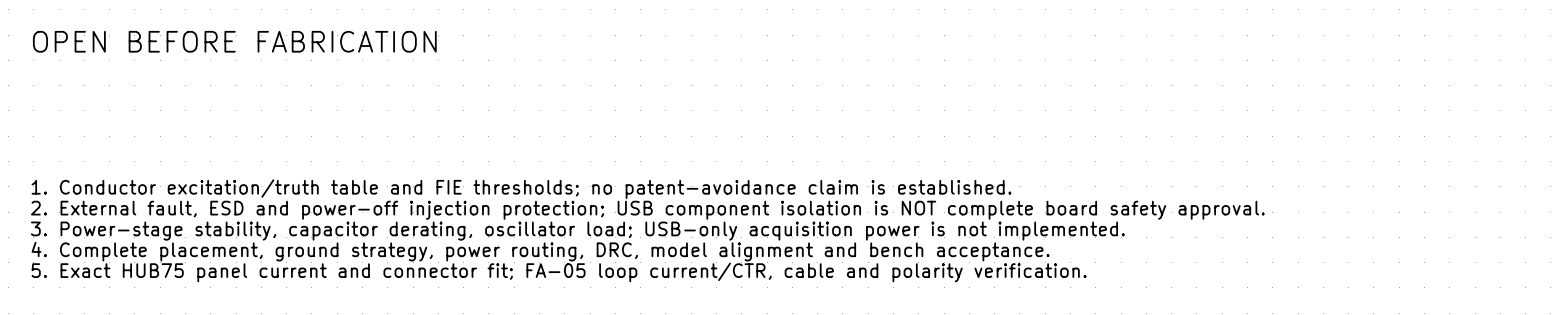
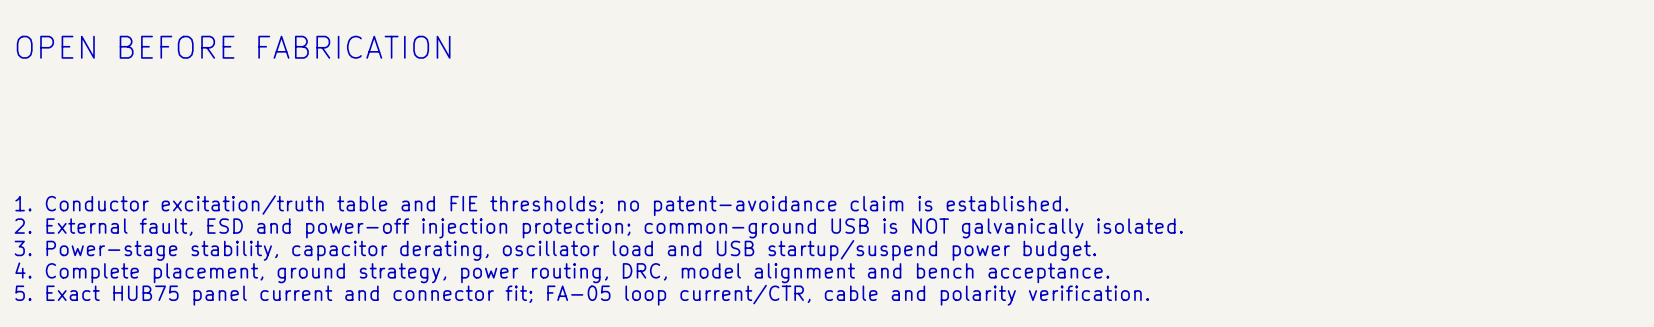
text: 2. External fault, ESD and power-off injection protection; USB component isolation is NOT complete board safety approval. (647, 210) -> 2. External fault, ESD and power-off injection protection; common-ground USB is NOT galvanically isolated. (598, 228)
text: 3. Power-stage stability, capacitor derating, oscillator load; USB-only acquisition power is not implemented. (577, 231) -> 3. Power-stage stability, capacitor derating, oscillator load and USB startup/suspend power budget. (555, 250)

